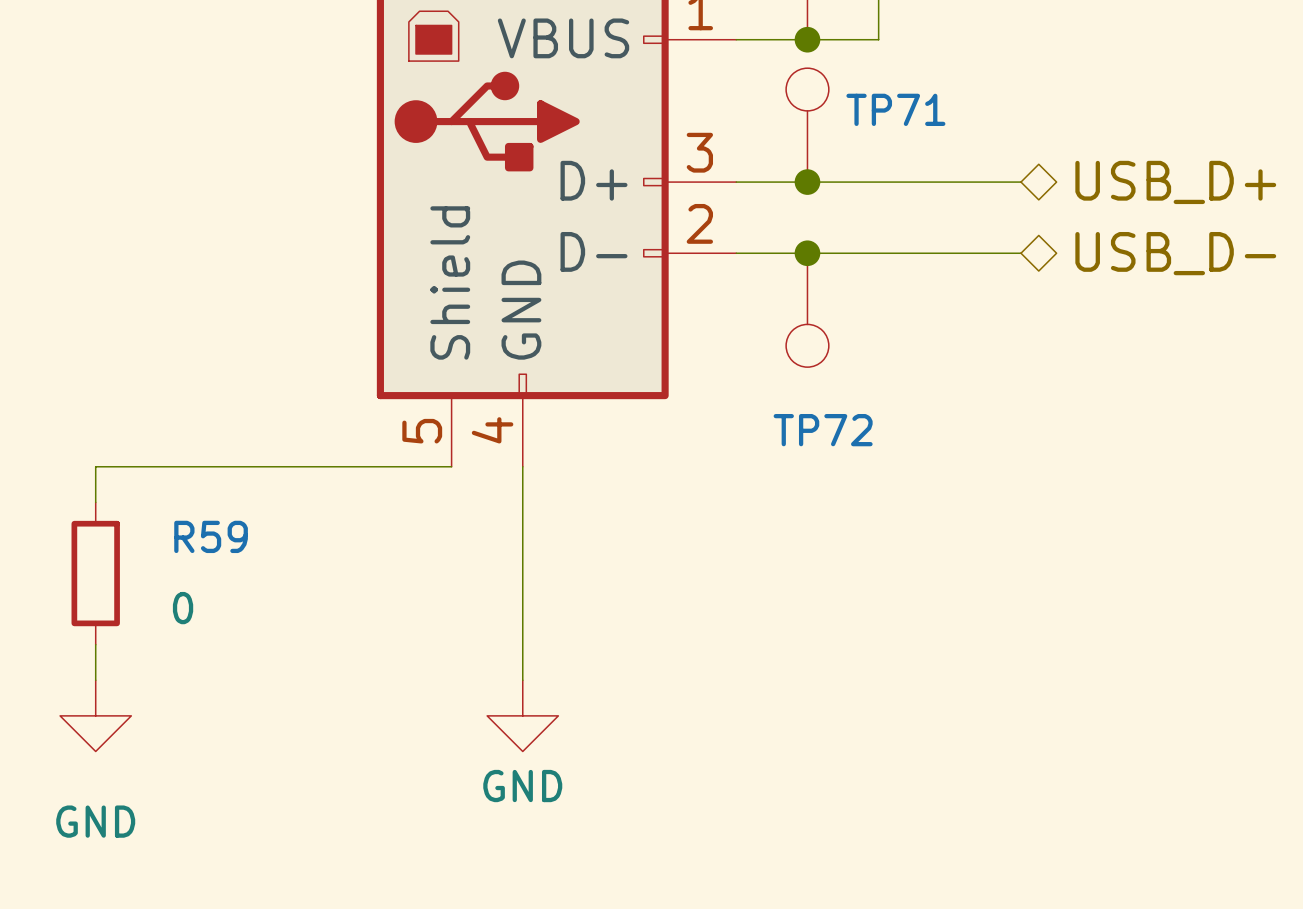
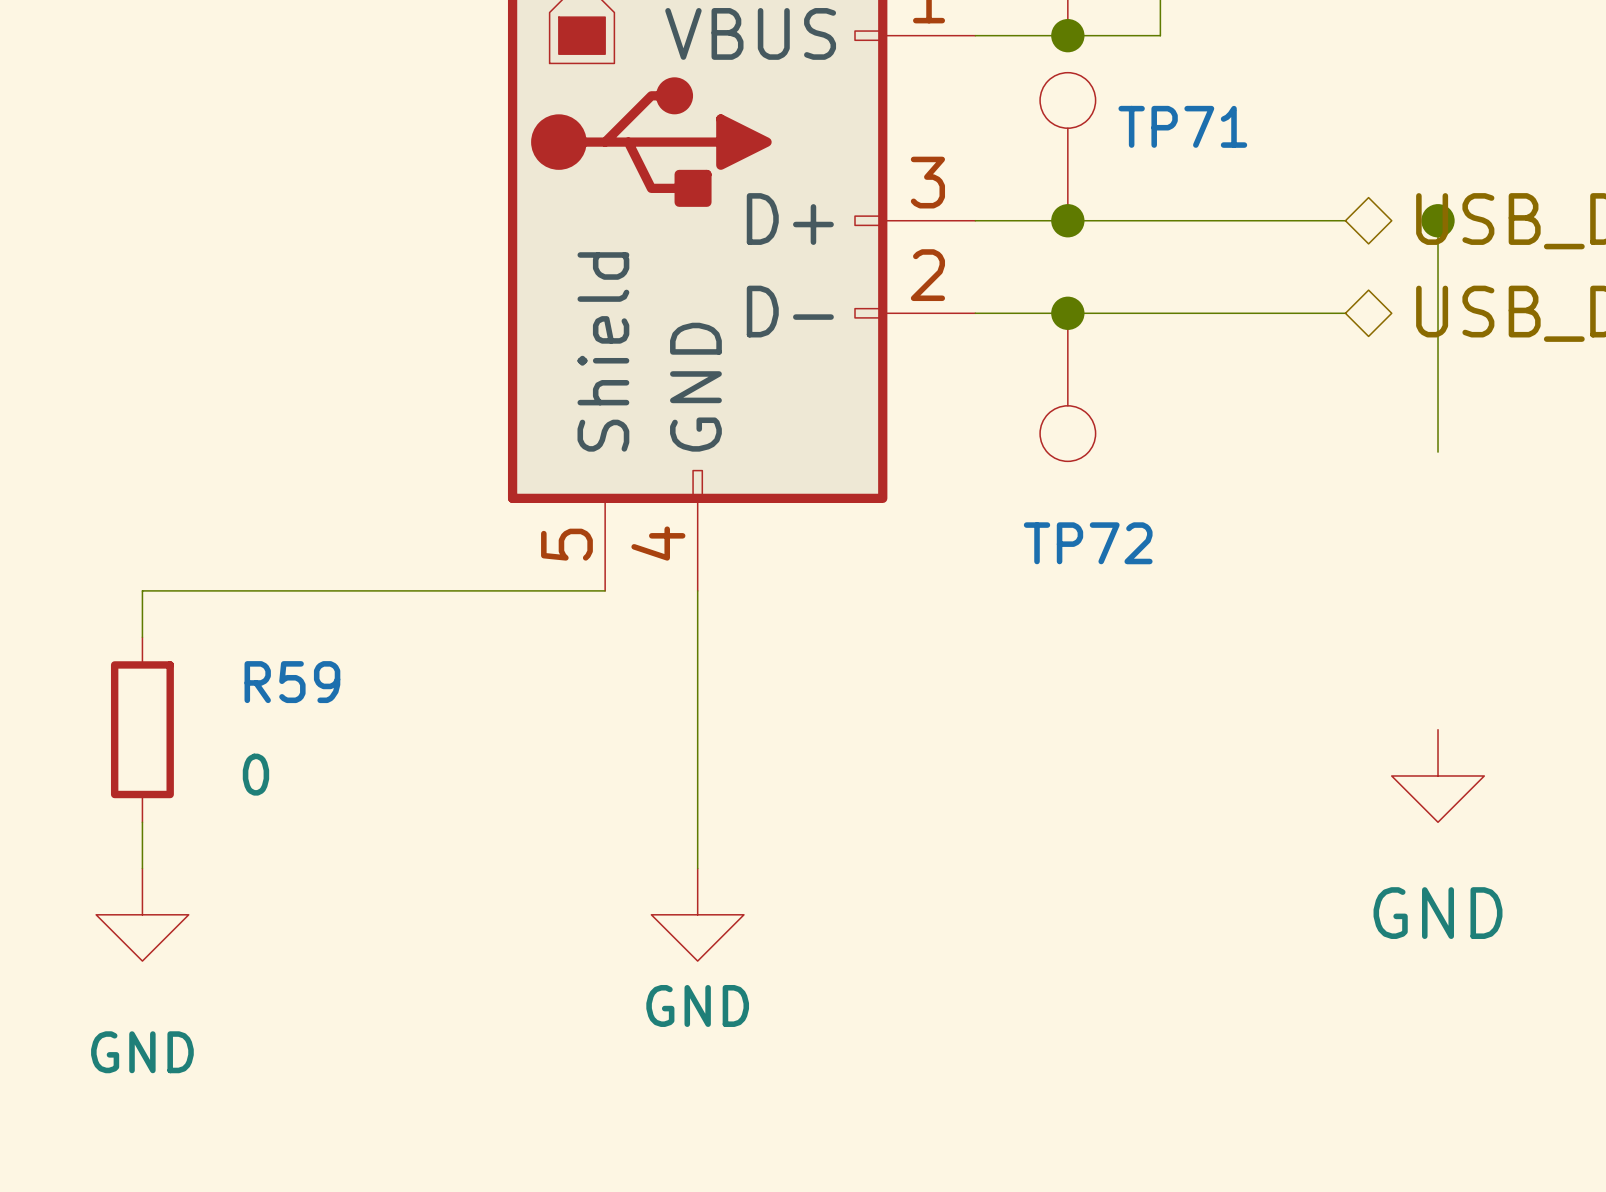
wire: none -> (1438, 220) (1438, 452)
junction: none -> (1438, 220)
power symbol: none -> GND (1438, 775)

